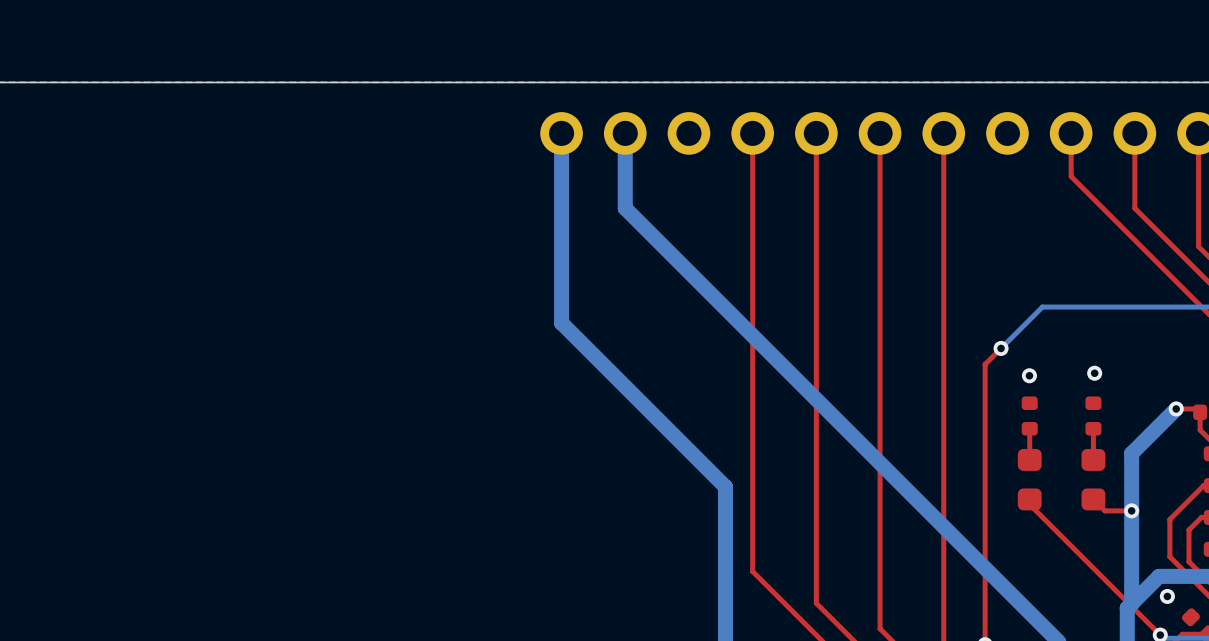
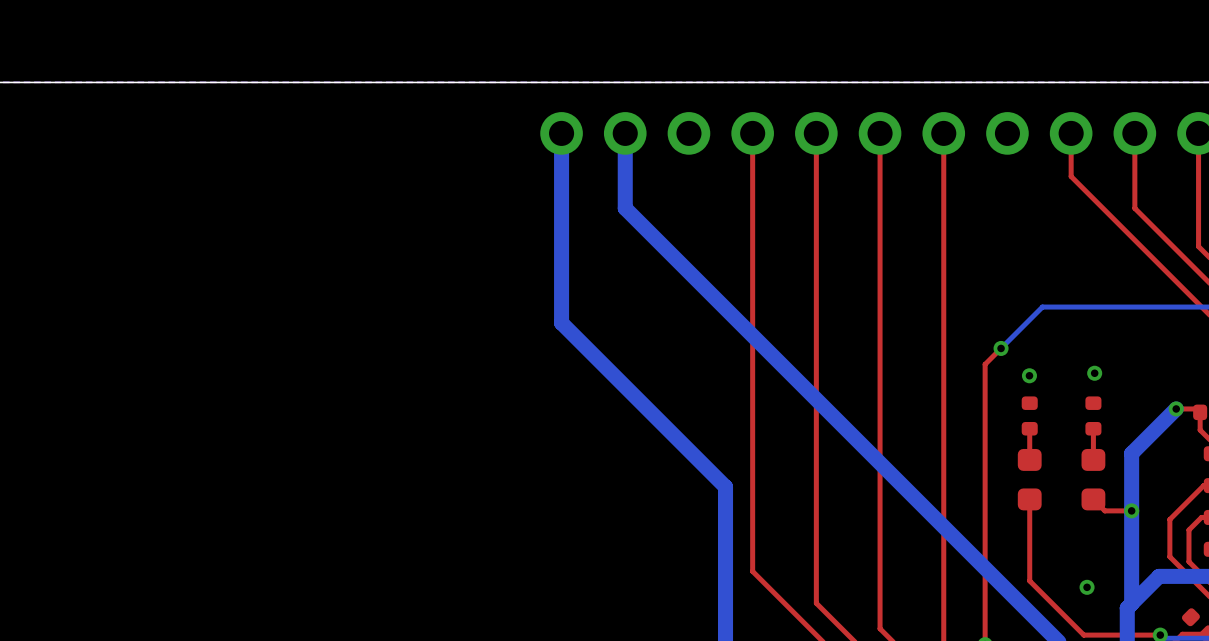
top track: (1029, 504) (1160, 635) -> (1029, 504) (1029, 580) (1083, 635) (1160, 635)
via: none -> (1087, 587)
via: (1167, 596) -> none

